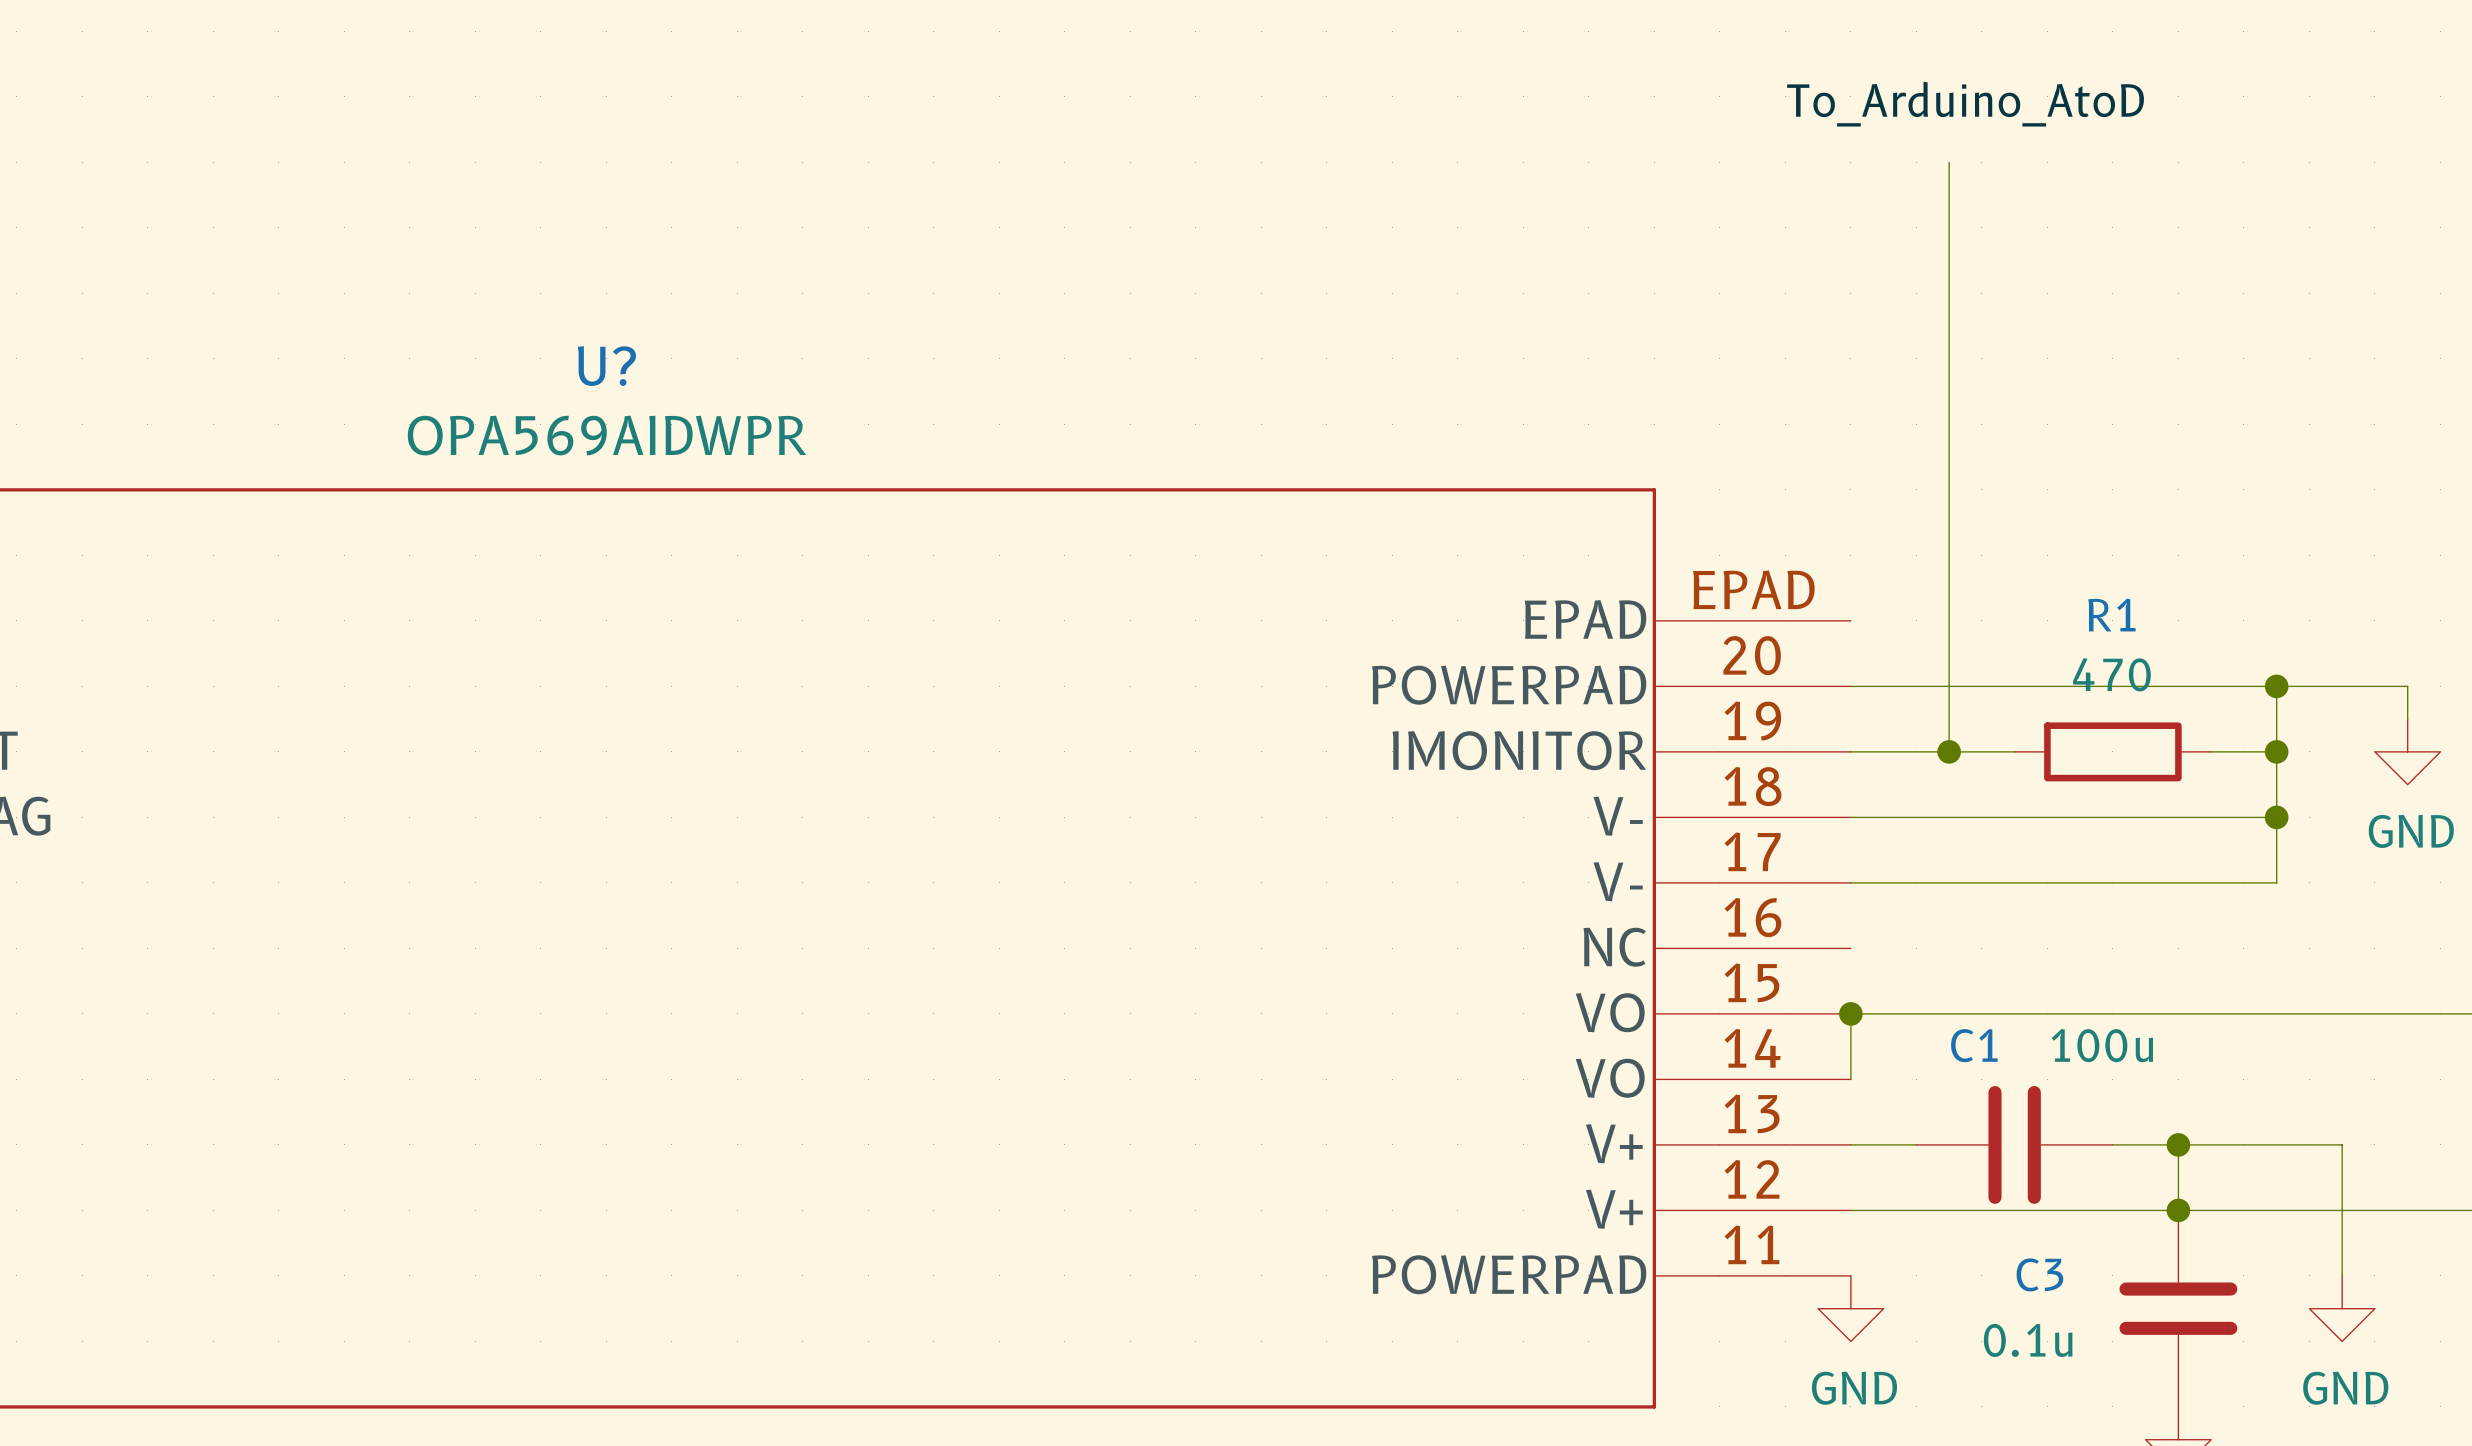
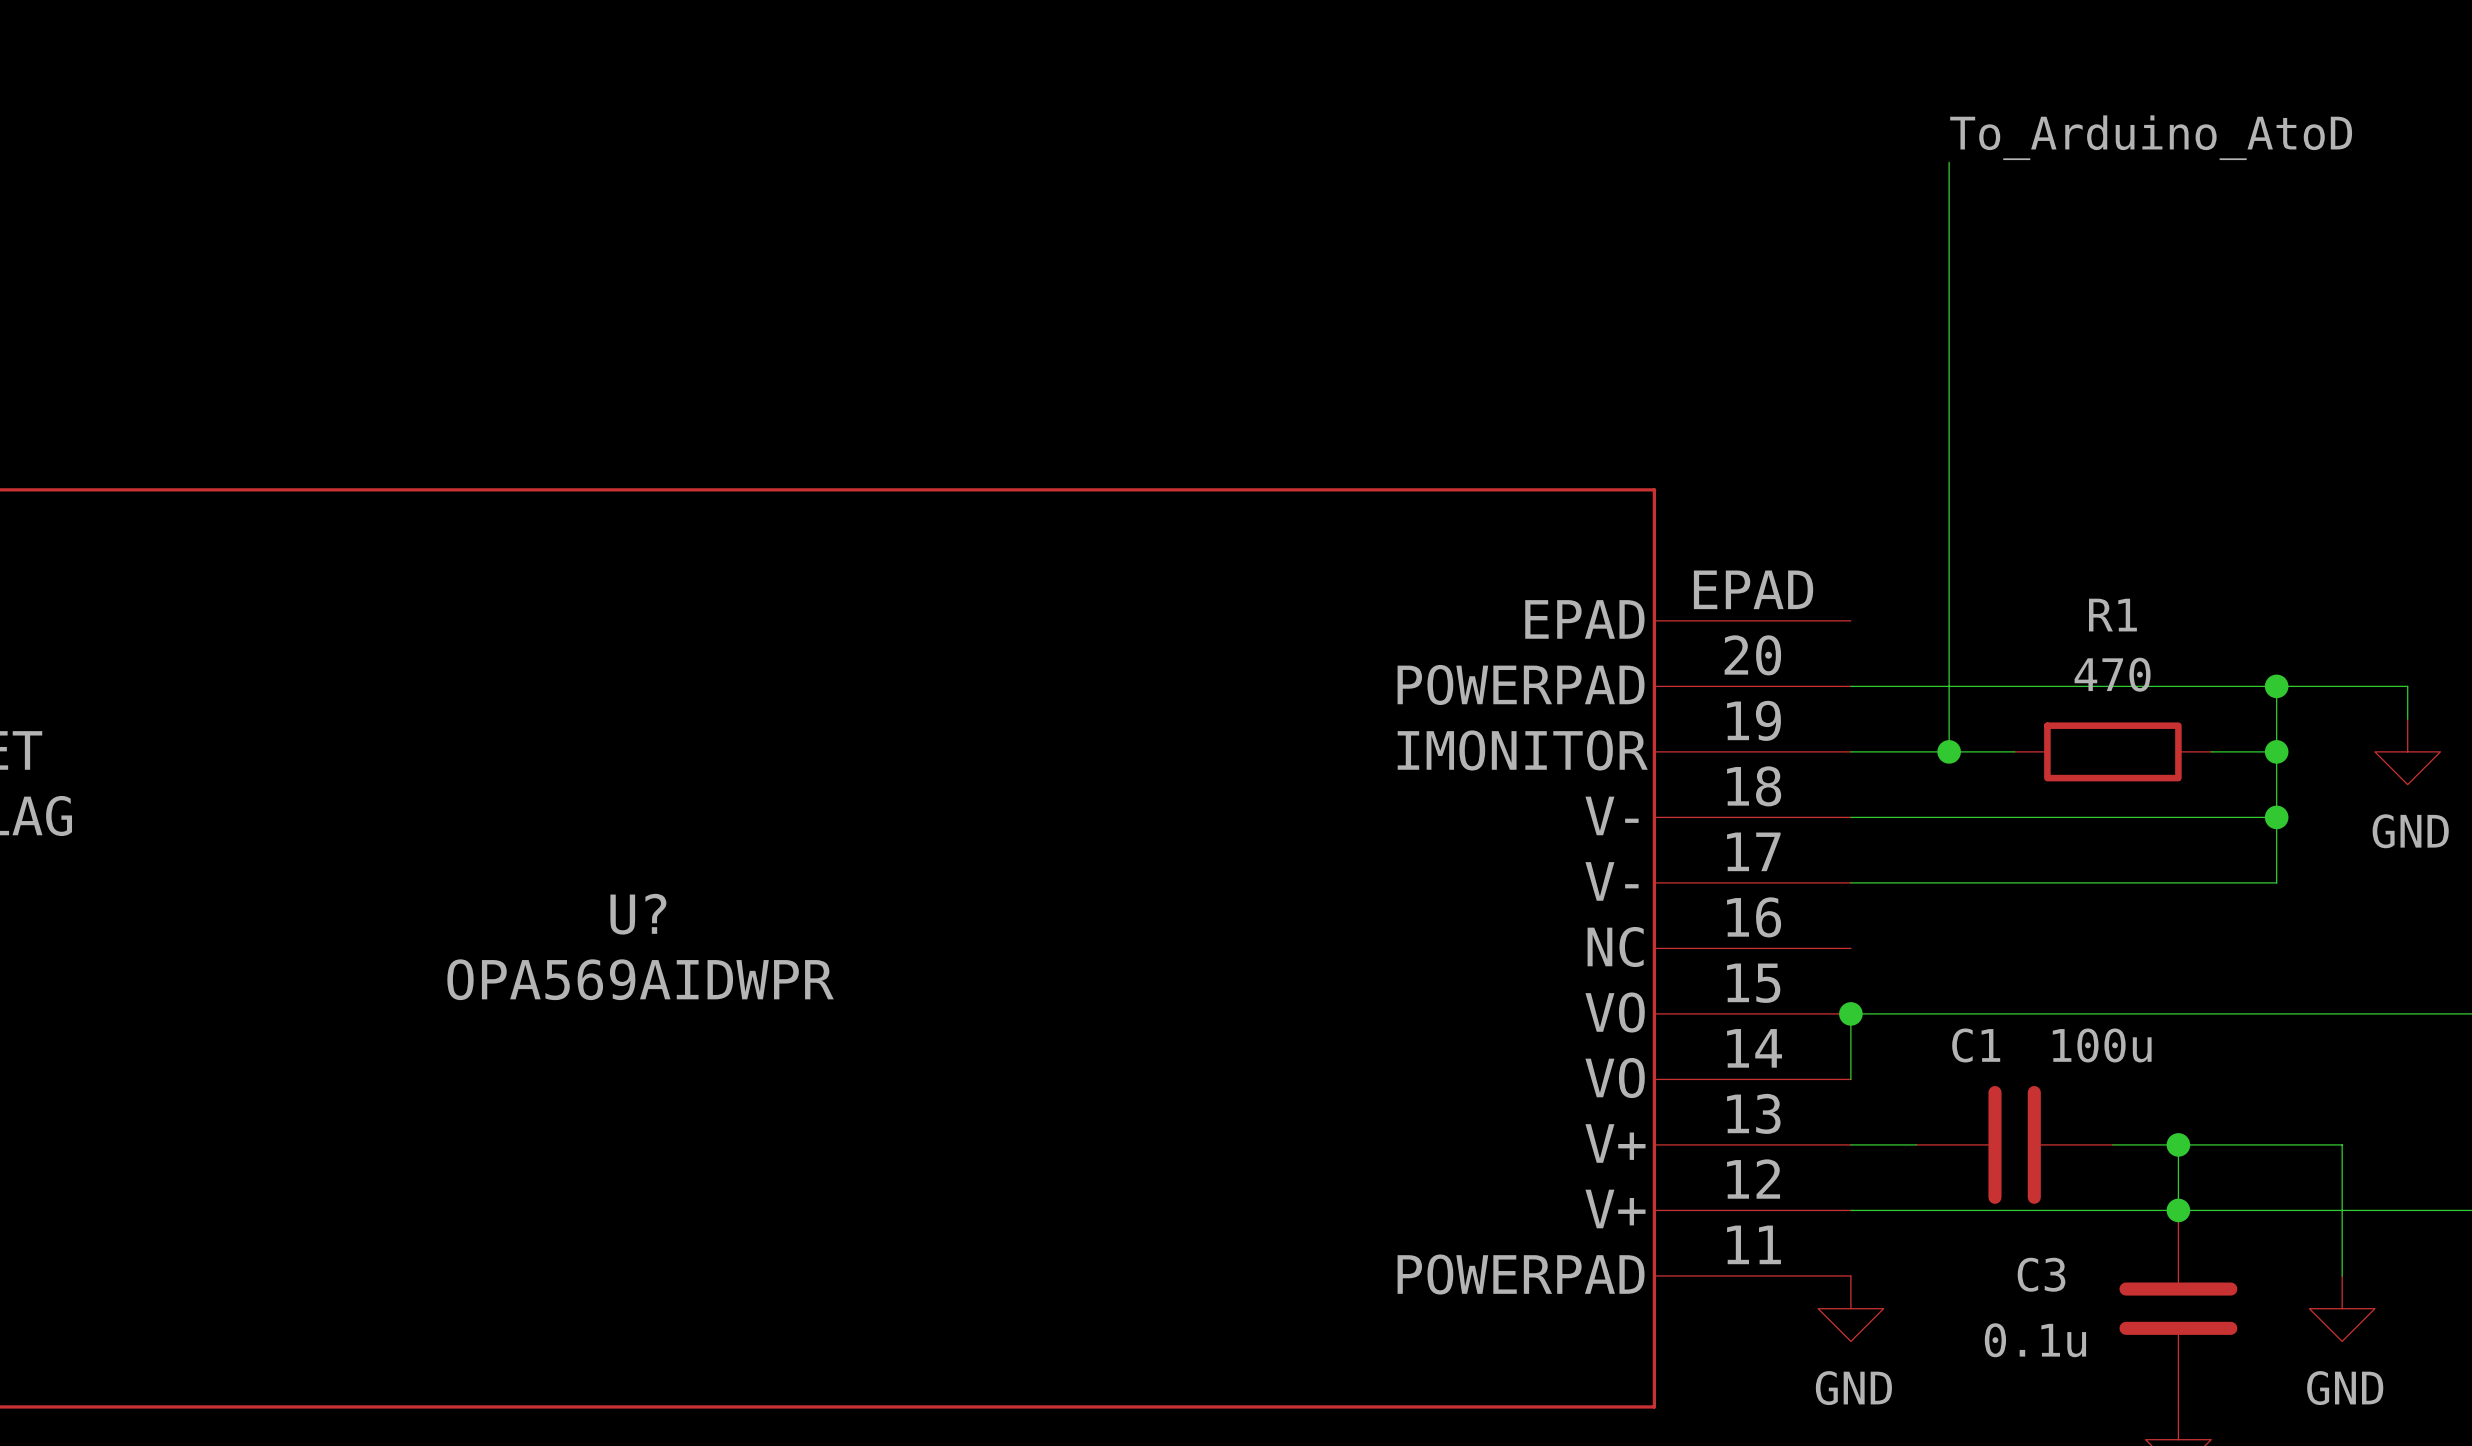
label position: To_Arduino_AtoD (1965, 104) -> To_Arduino_AtoD (2151, 137)
U? name position: U? (606, 366) -> U? (638, 914)
U? value position: OPA569AIDWPR (606, 435) -> OPA569AIDWPR (640, 979)

